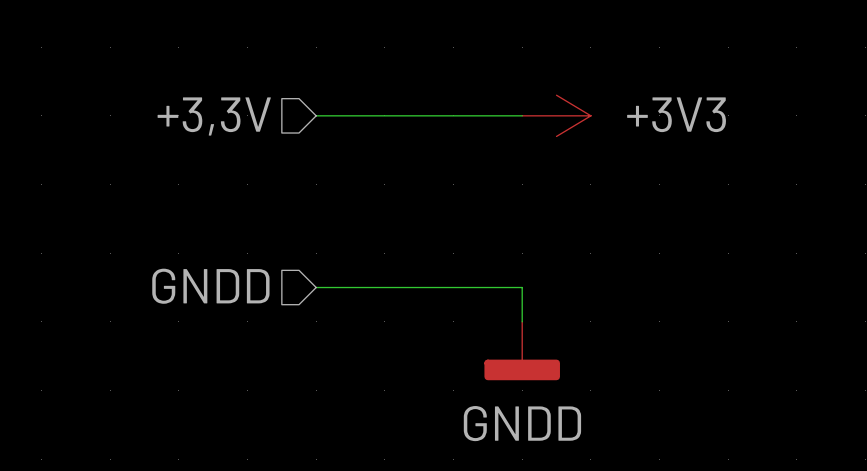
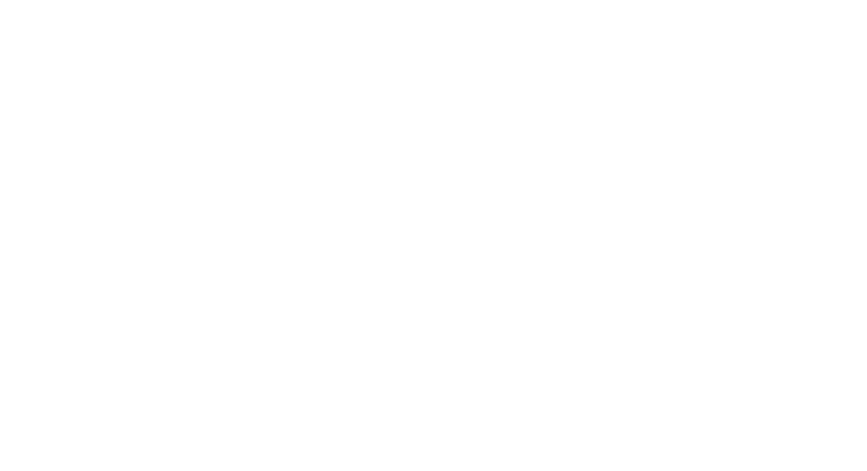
wire: (316, 115) (522, 115) -> none
power symbol: +3V3 (556, 115) -> none
hierarchical label: +3,3V (214, 116) -> none
hierarchical label: GNDD (210, 286) -> none
wire: (316, 287) (522, 287) (522, 321) -> none
power symbol: GNDD (522, 351) -> none

